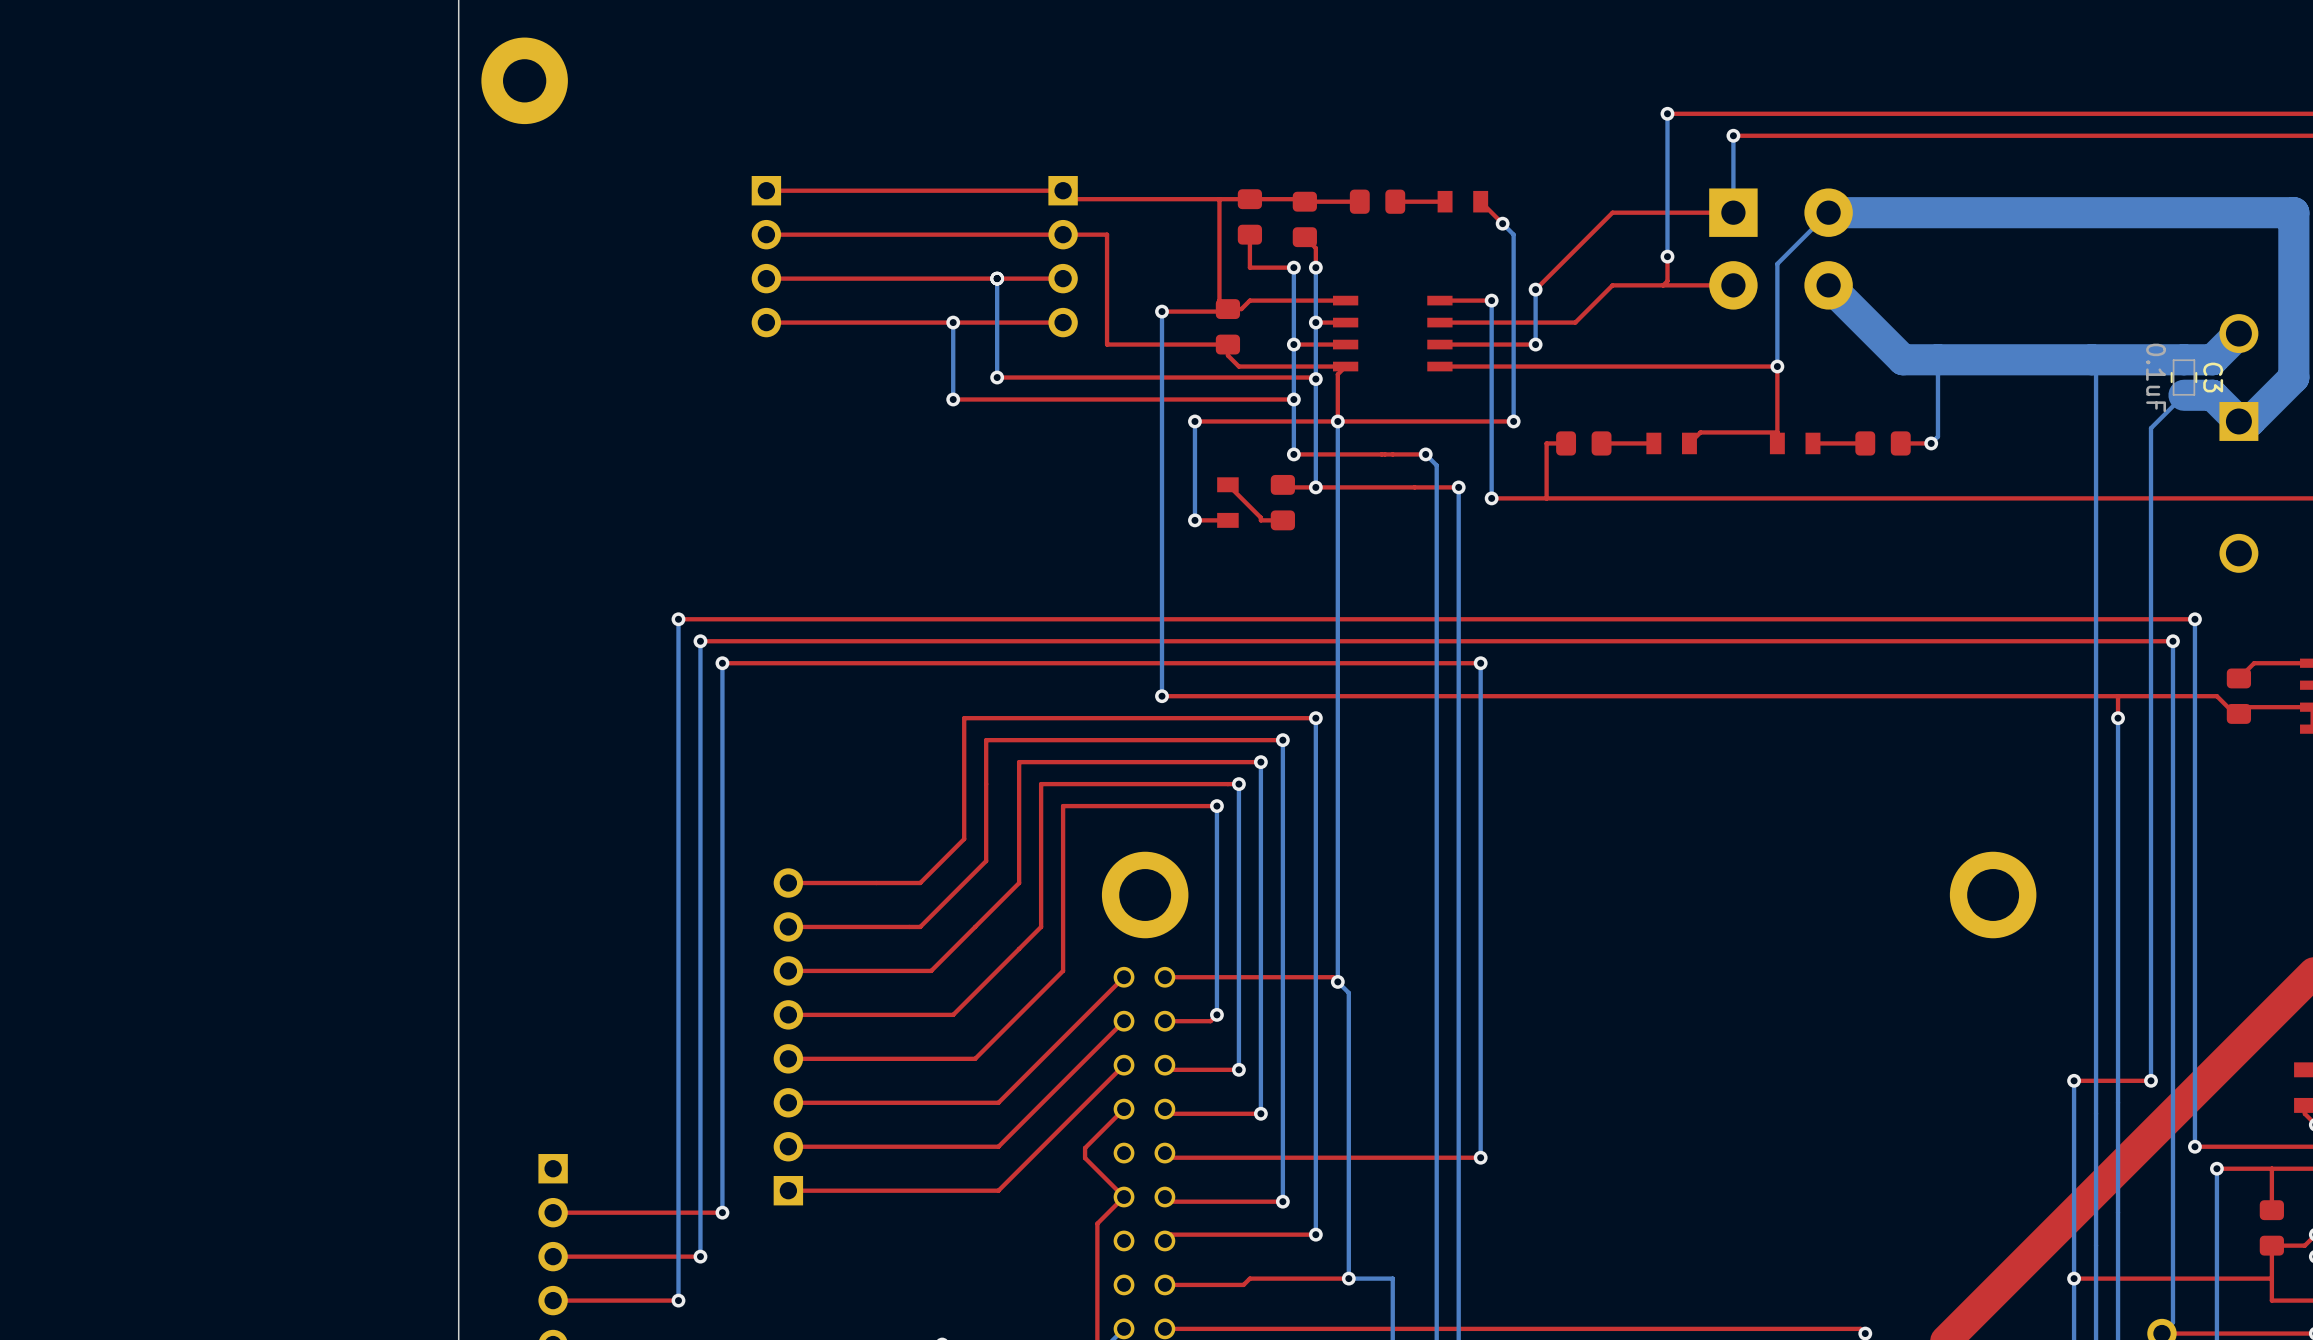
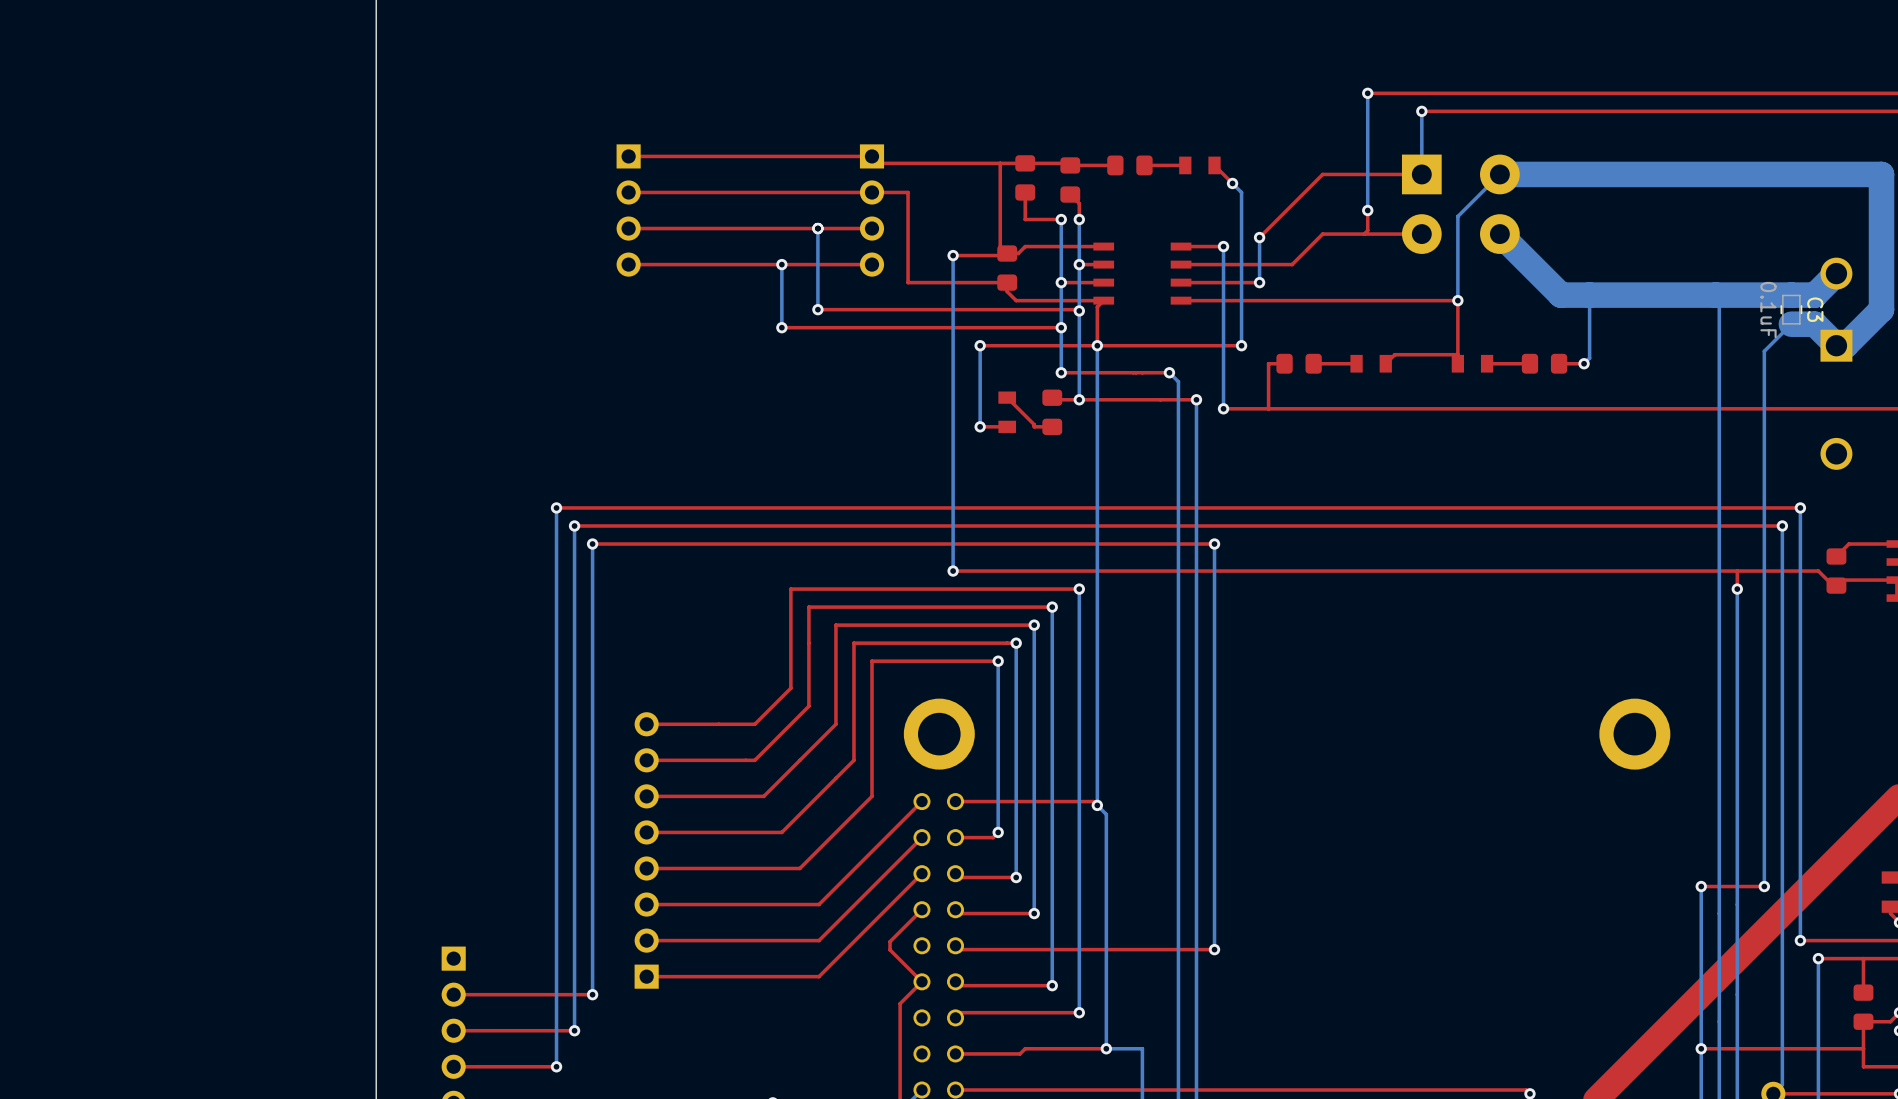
part: (524, 80) -> none

